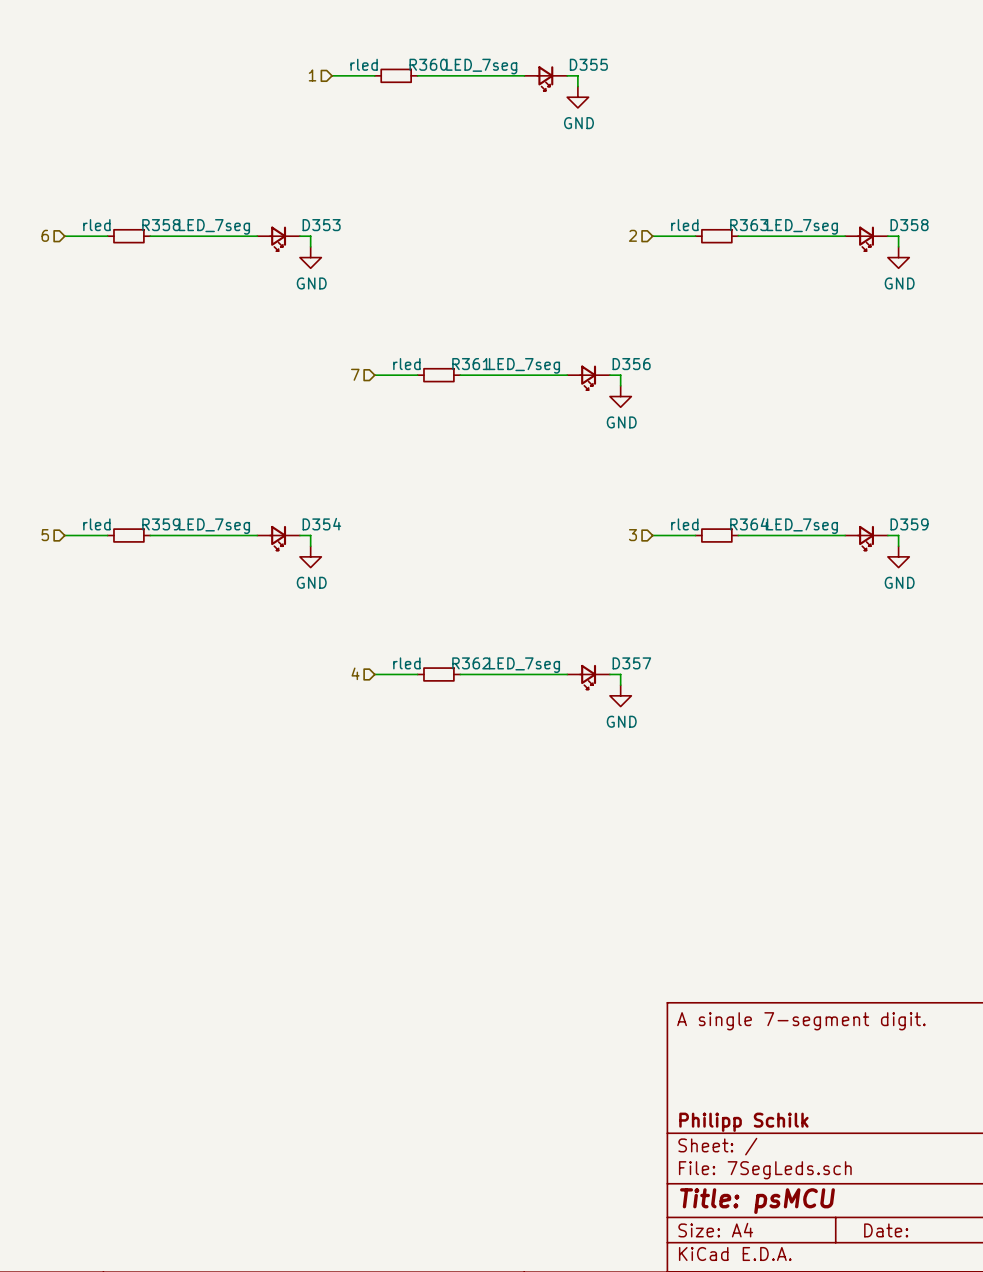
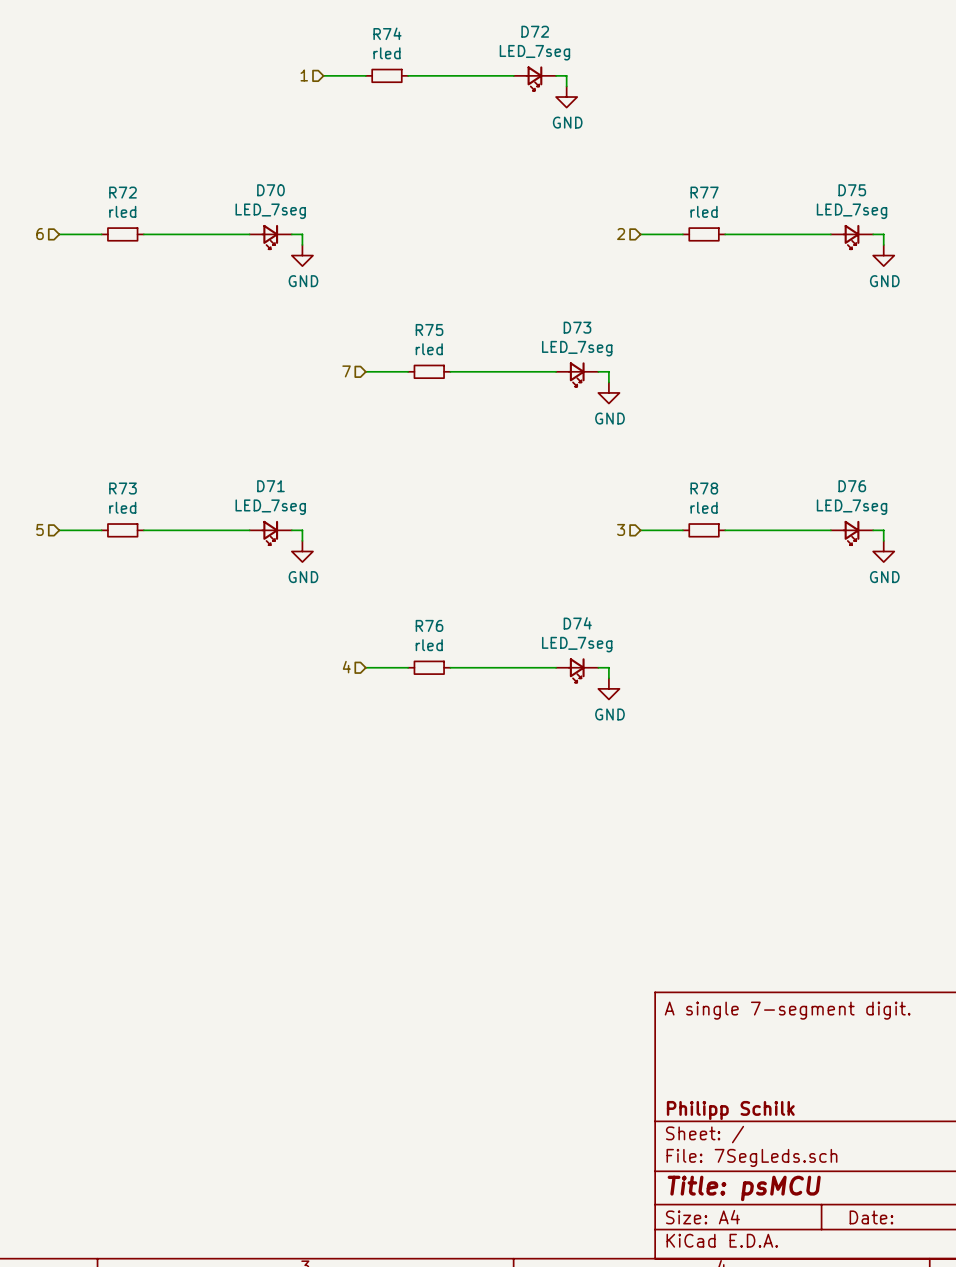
R360 value position: rled (364, 64) -> rled (386, 53)
R360 name: R360 (428, 64) -> R74 (387, 33)
D355 name: D355 (588, 64) -> D72 (535, 31)
D355 value position: LED_7seg (481, 66) -> LED_7seg (534, 52)
R358 value position: rled (96, 225) -> rled (122, 211)
R358 name: R358 (161, 225) -> R72 (123, 192)
D353 name: D353 (321, 225) -> D70 (270, 190)
R363 value position: rled (684, 225) -> rled (704, 211)
R363 name: R363 (749, 225) -> R77 (704, 192)
D358 name: D358 (909, 225) -> D75 (852, 190)
D353 value position: LED_7seg (214, 226) -> LED_7seg (270, 211)
D358 value position: LED_7seg (802, 226) -> LED_7seg (852, 211)
R361 value position: rled (406, 364) -> rled (429, 349)
R361 name: R361 (471, 364) -> R75 (429, 329)
D356 name: D356 (631, 364) -> D73 (577, 327)
D356 value position: LED_7seg (524, 365) -> LED_7seg (577, 348)
R359 value position: rled (96, 524) -> rled (122, 507)
R359 name: R359 (161, 524) -> R73 (123, 488)
D354 name: D354 (321, 524) -> D71 (270, 486)
R364 value position: rled (684, 524) -> rled (704, 507)
R364 name: R364 (749, 524) -> R78 (704, 488)
D359 name: D359 (909, 524) -> D76 (852, 486)
D354 value position: LED_7seg (214, 526) -> LED_7seg (270, 507)
D359 value position: LED_7seg (802, 526) -> LED_7seg (852, 507)
R362 value position: rled (406, 663) -> rled (429, 645)
R362 name: R362 (471, 663) -> R76 (429, 625)
D357 name: D357 (631, 663) -> D74 (577, 623)
D357 value position: LED_7seg (524, 665) -> LED_7seg (577, 644)

